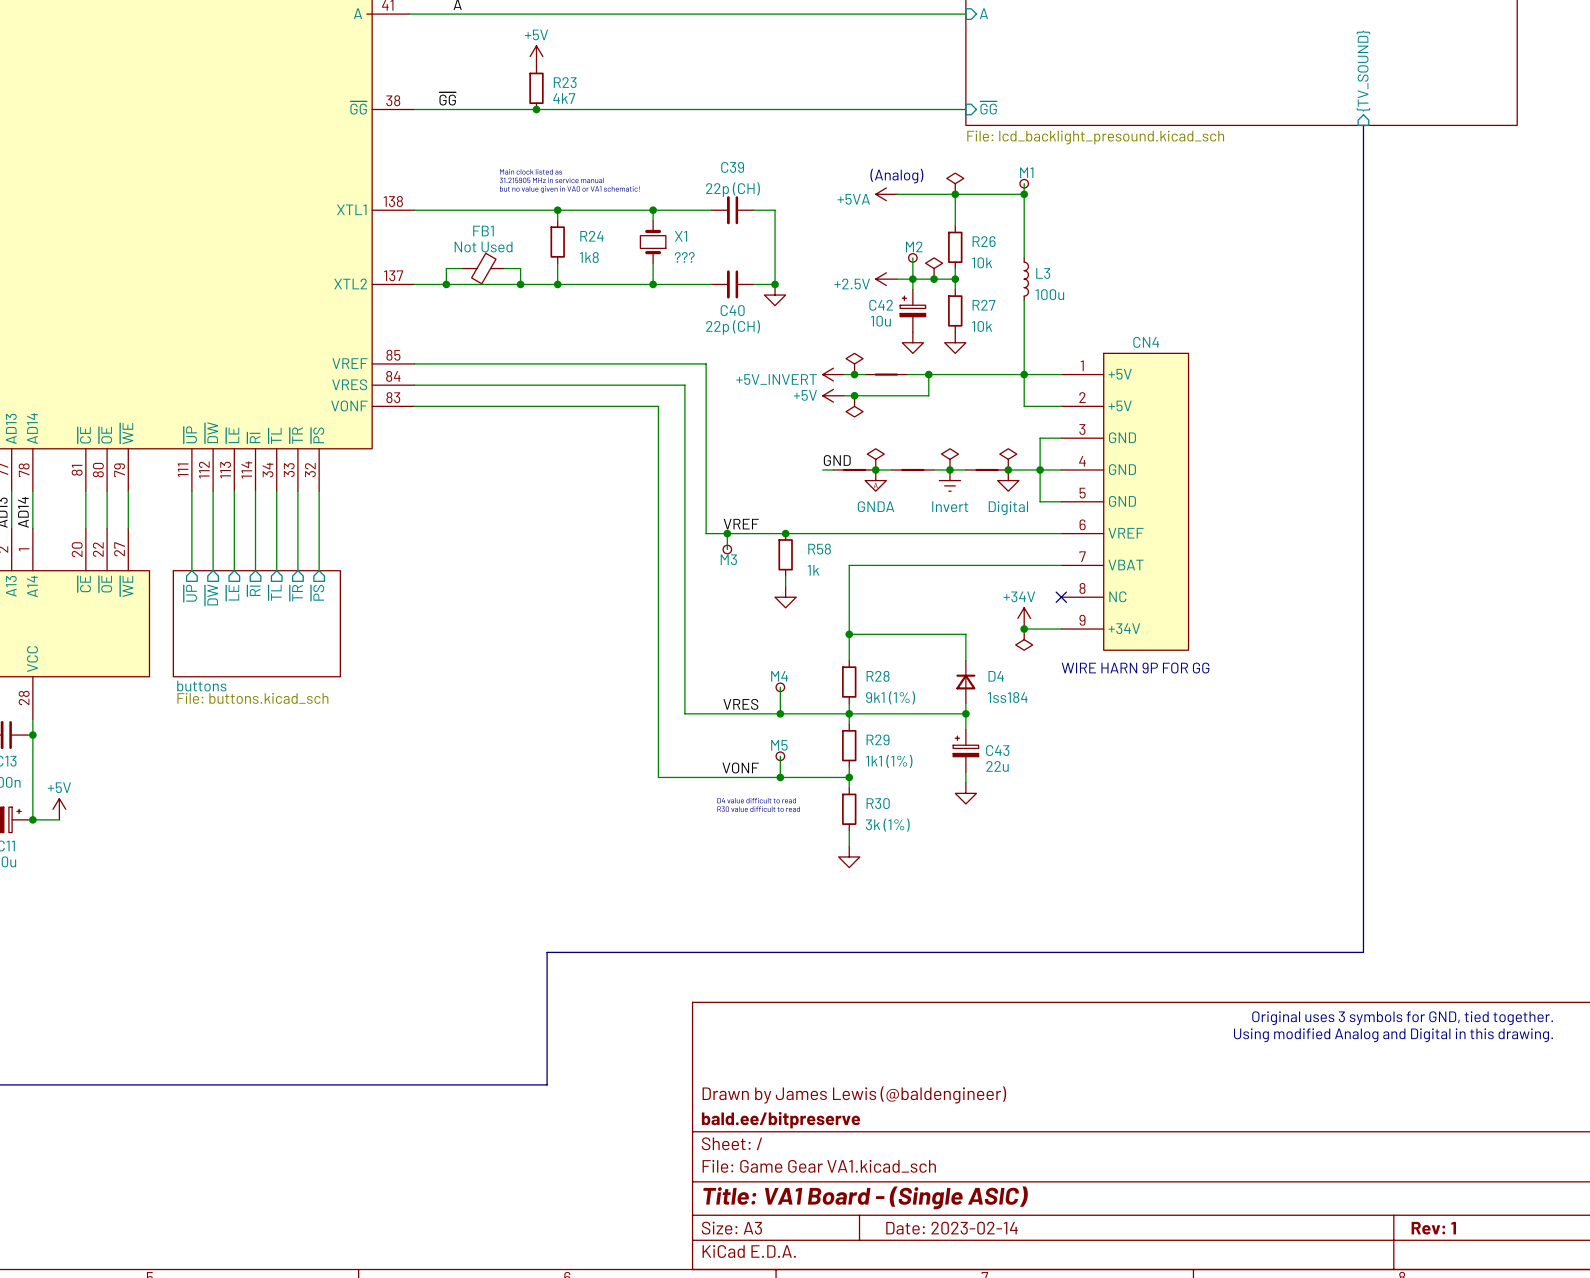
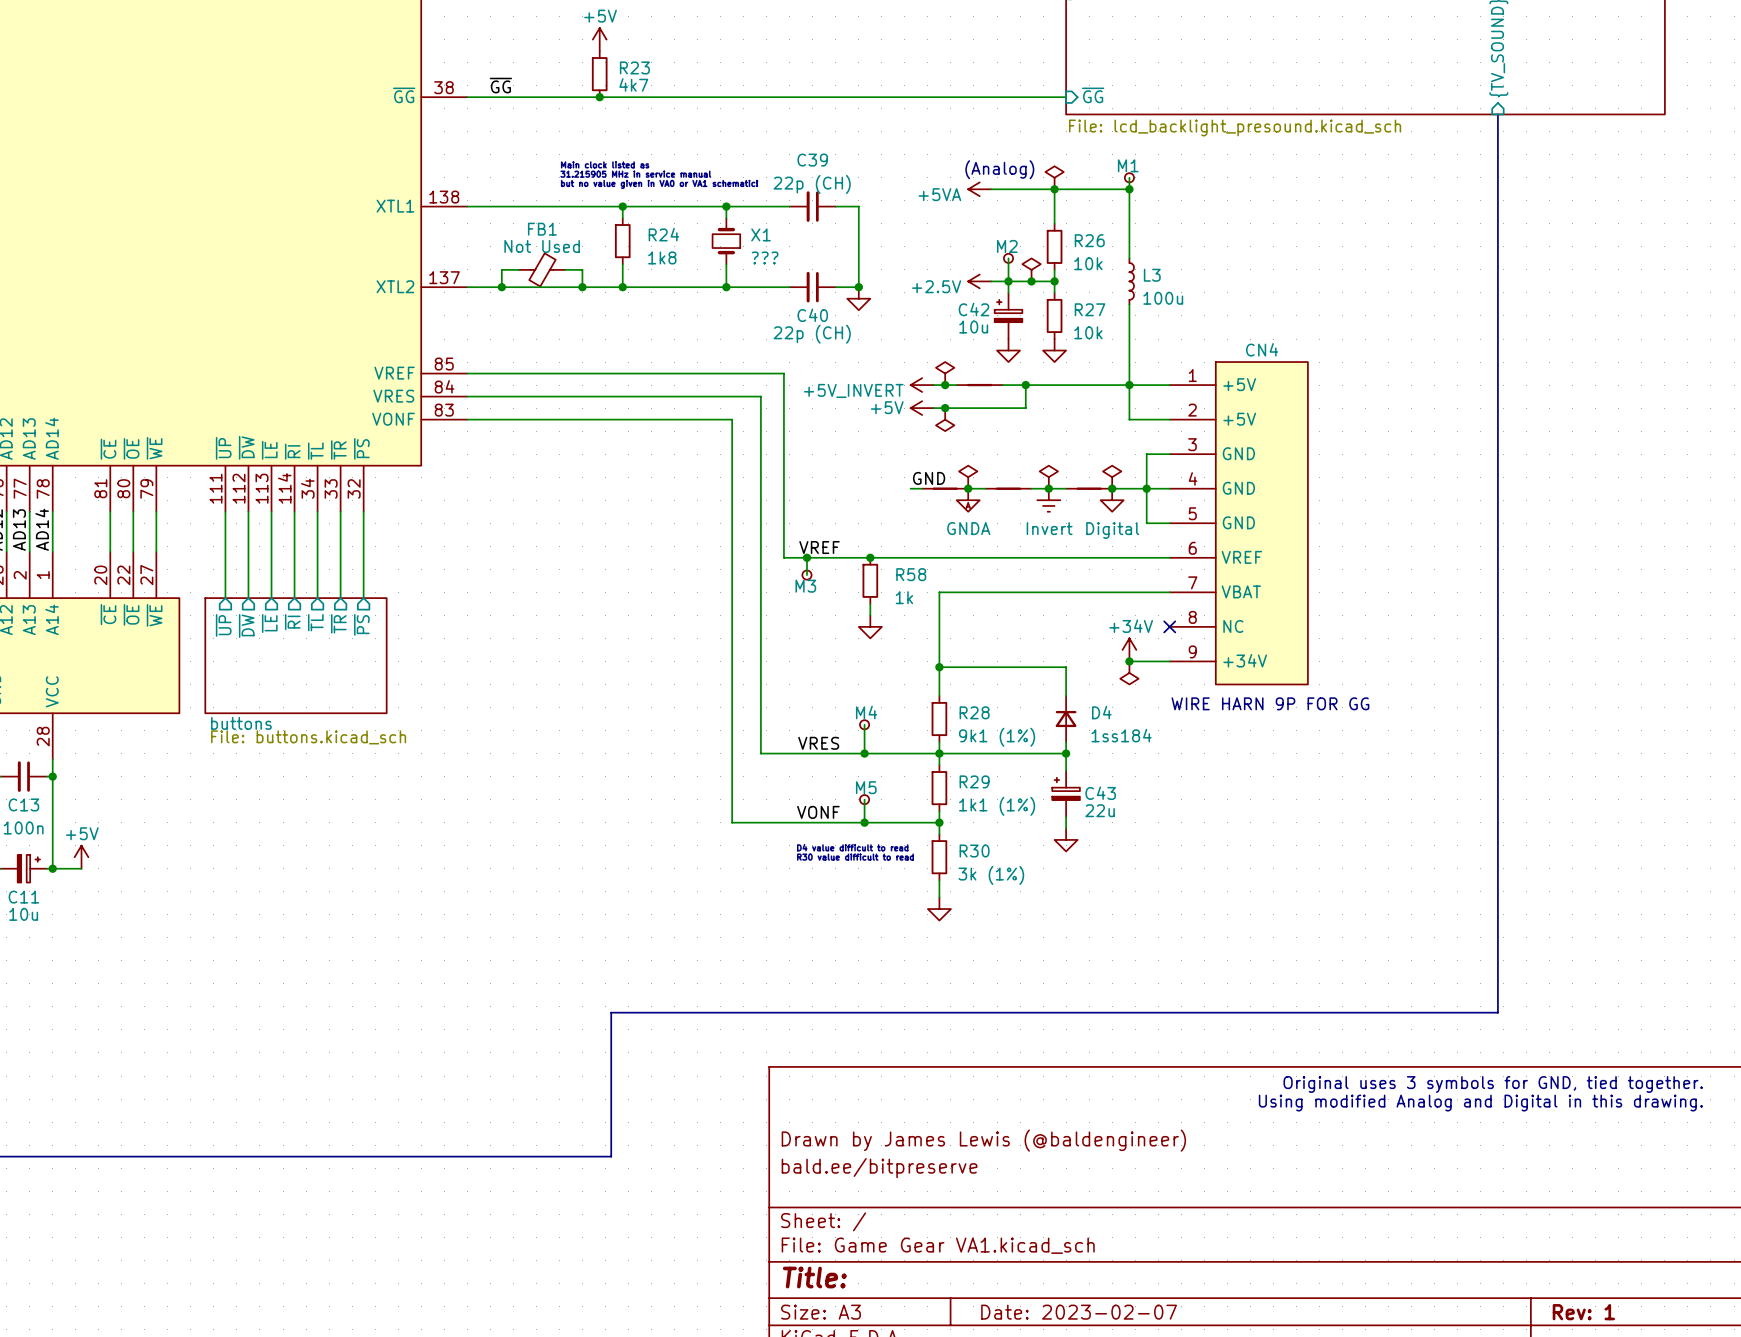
title block: none -> Drawn by James Lewis (@baldengineer) (983, 1140)
title block: Drawn by James Lewis (@baldengineer) (854, 1094) -> bald.ee/bitpreserve (879, 1168)
title block: bald.ee/bitpreserve (781, 1120) -> none
title block: Title: VA1 Board - (Single ASIC) (865, 1197) -> Title: (814, 1277)
title block: Date: 2023-02-14 (952, 1228) -> Date: 2023-02-07 (1079, 1312)

